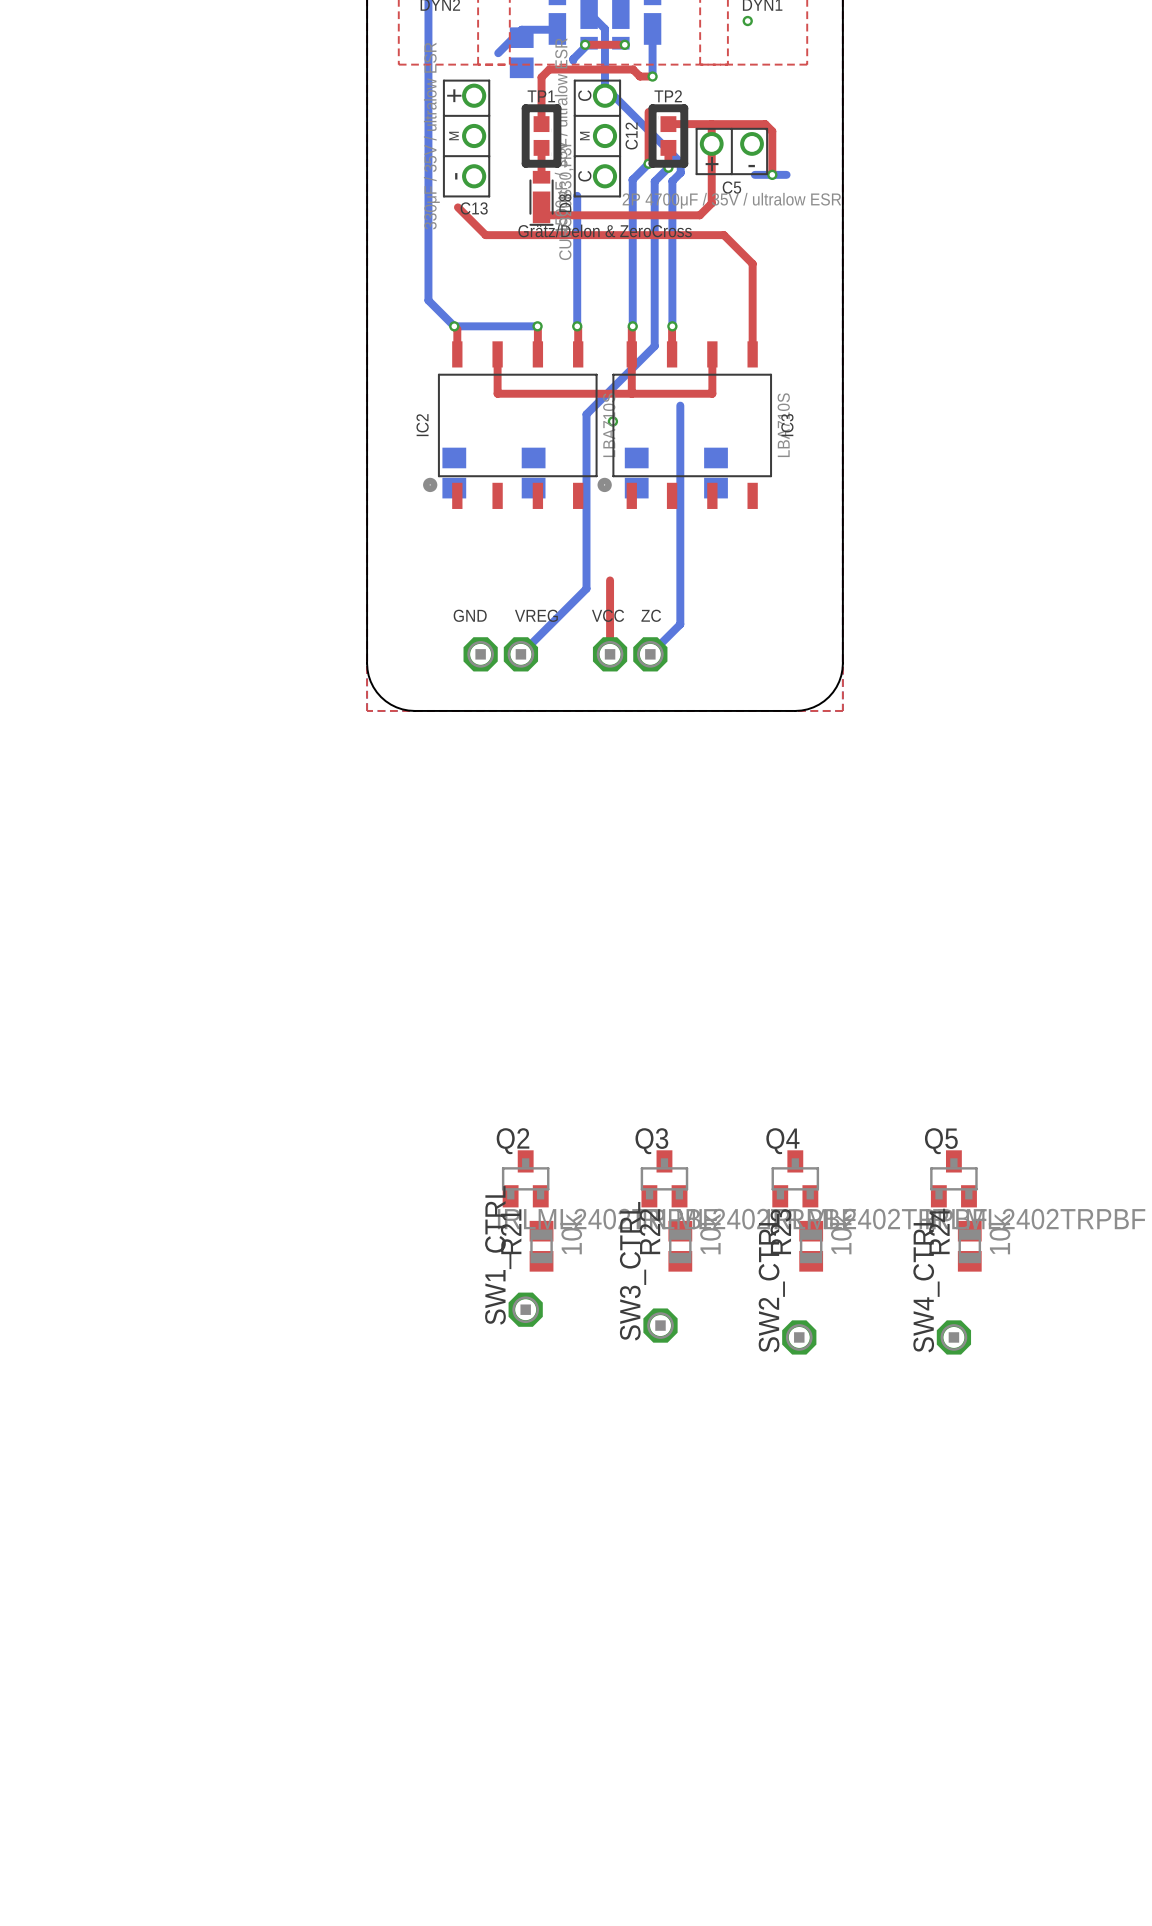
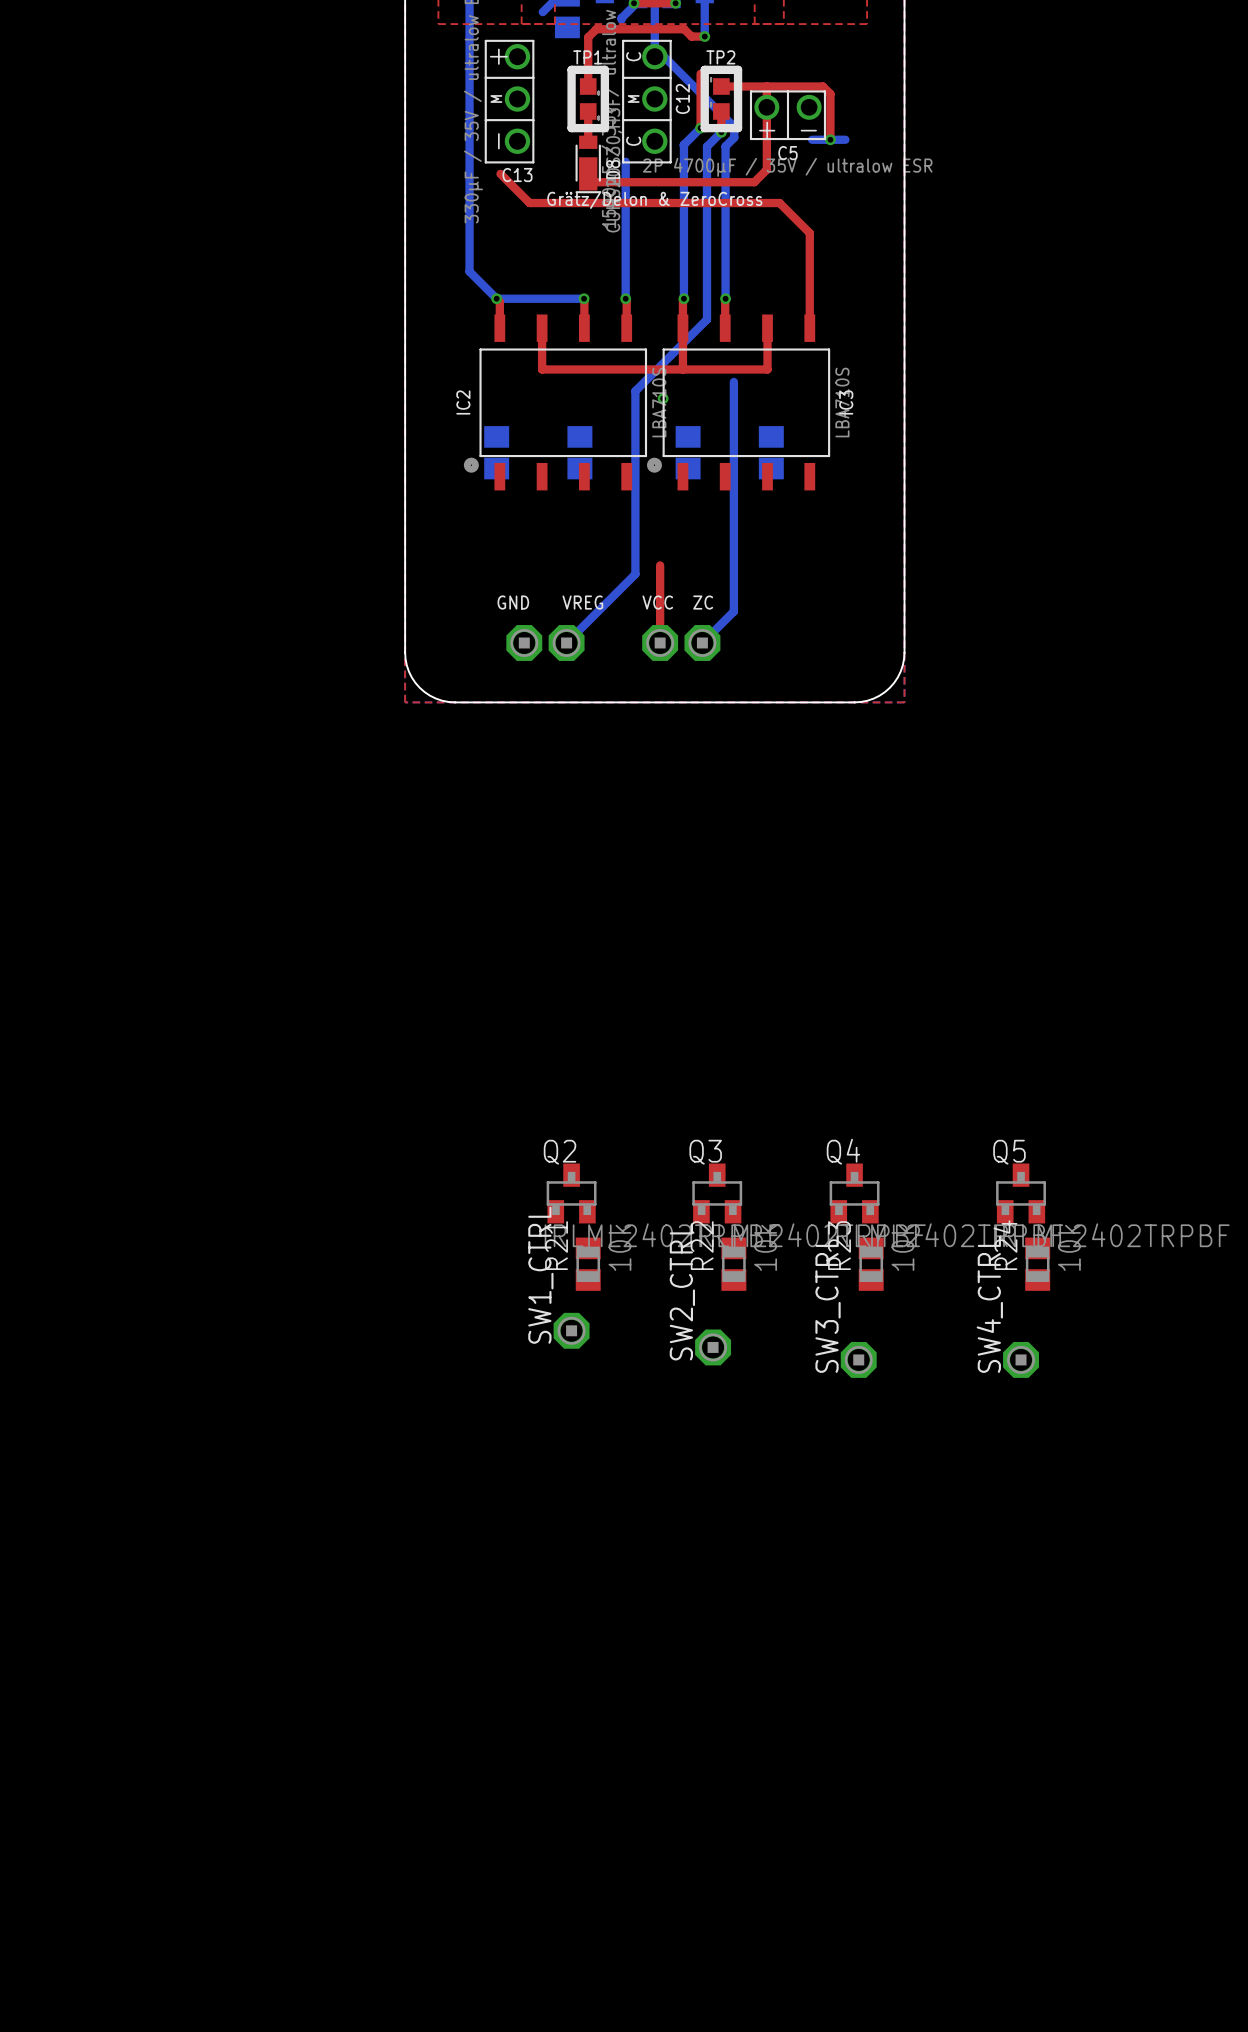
SW3_CTRL name: SW3_CTRL (633, 1271) -> SW2_CTRL (682, 1291)
SW2_CTRL name: SW2_CTRL (771, 1283) -> SW3_CTRL (828, 1304)

